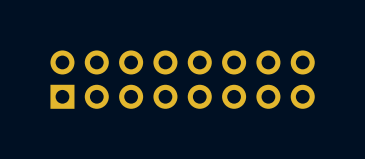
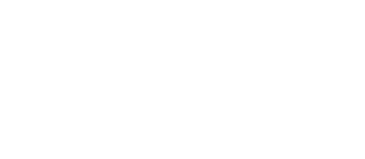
part: (182, 79) -> none

